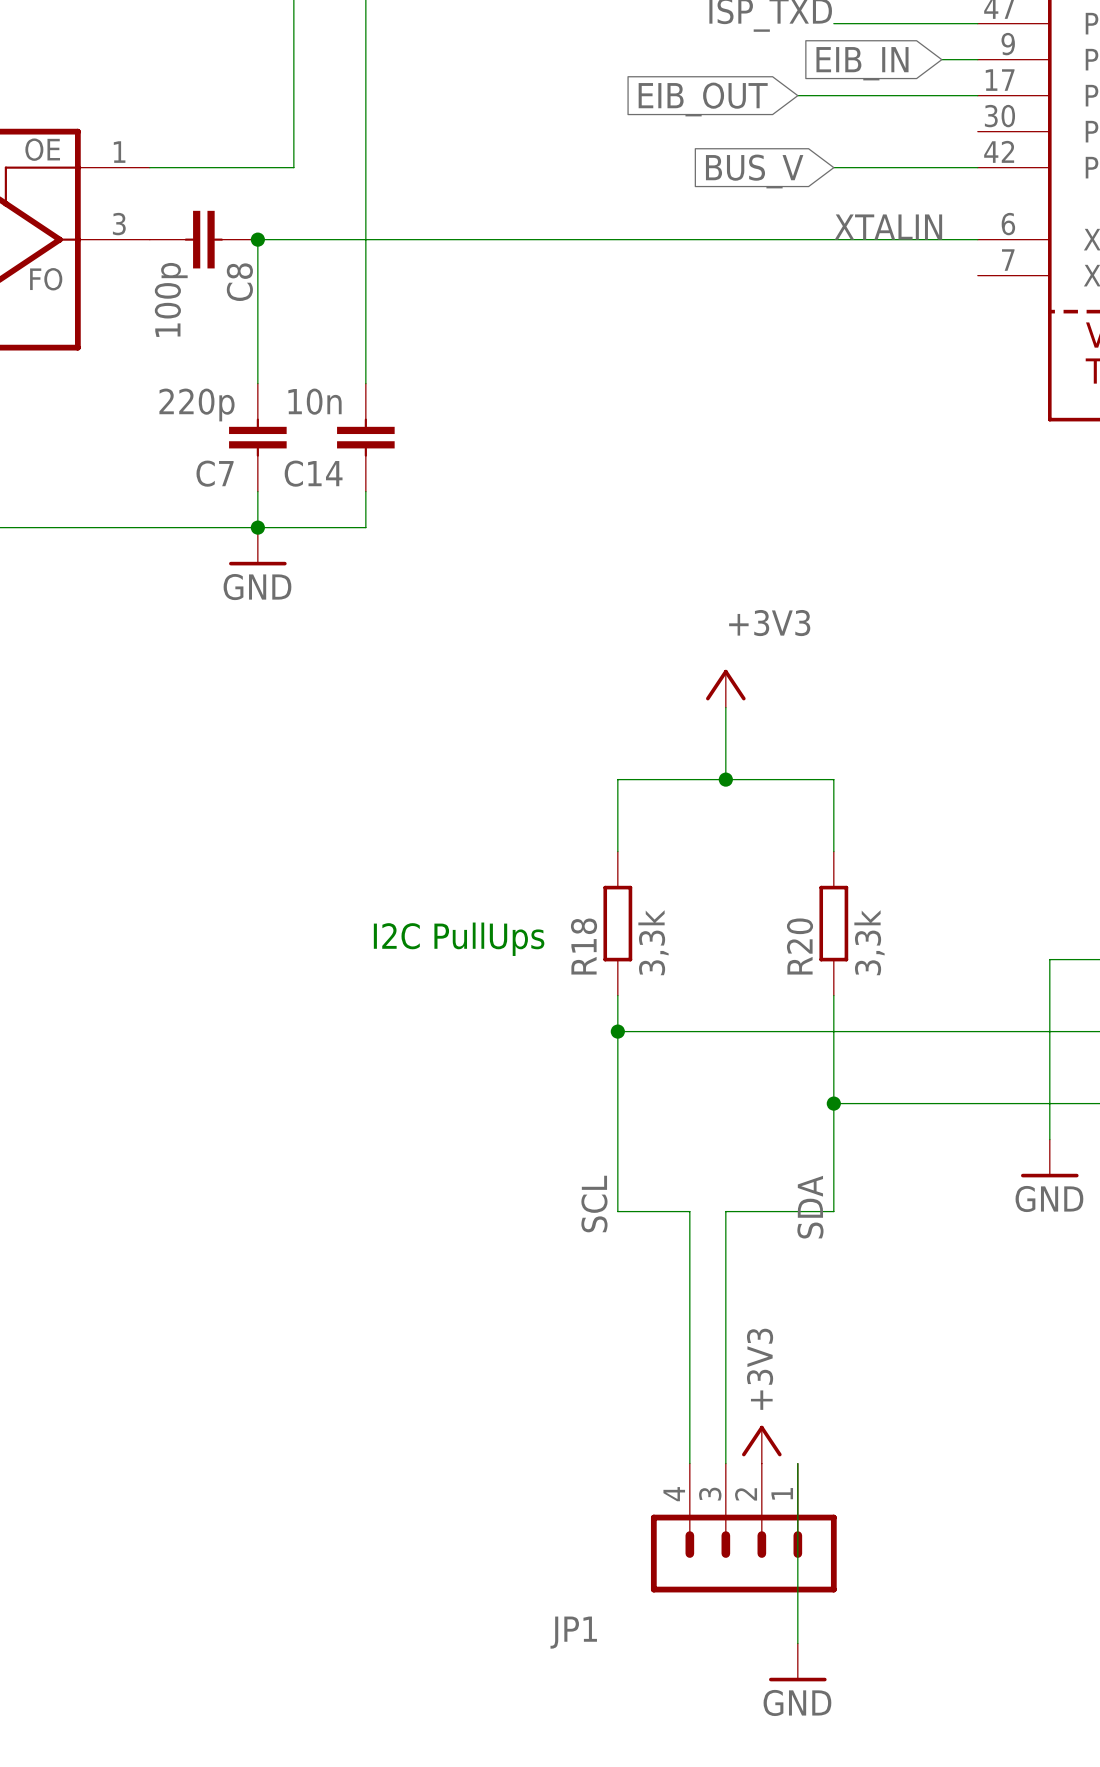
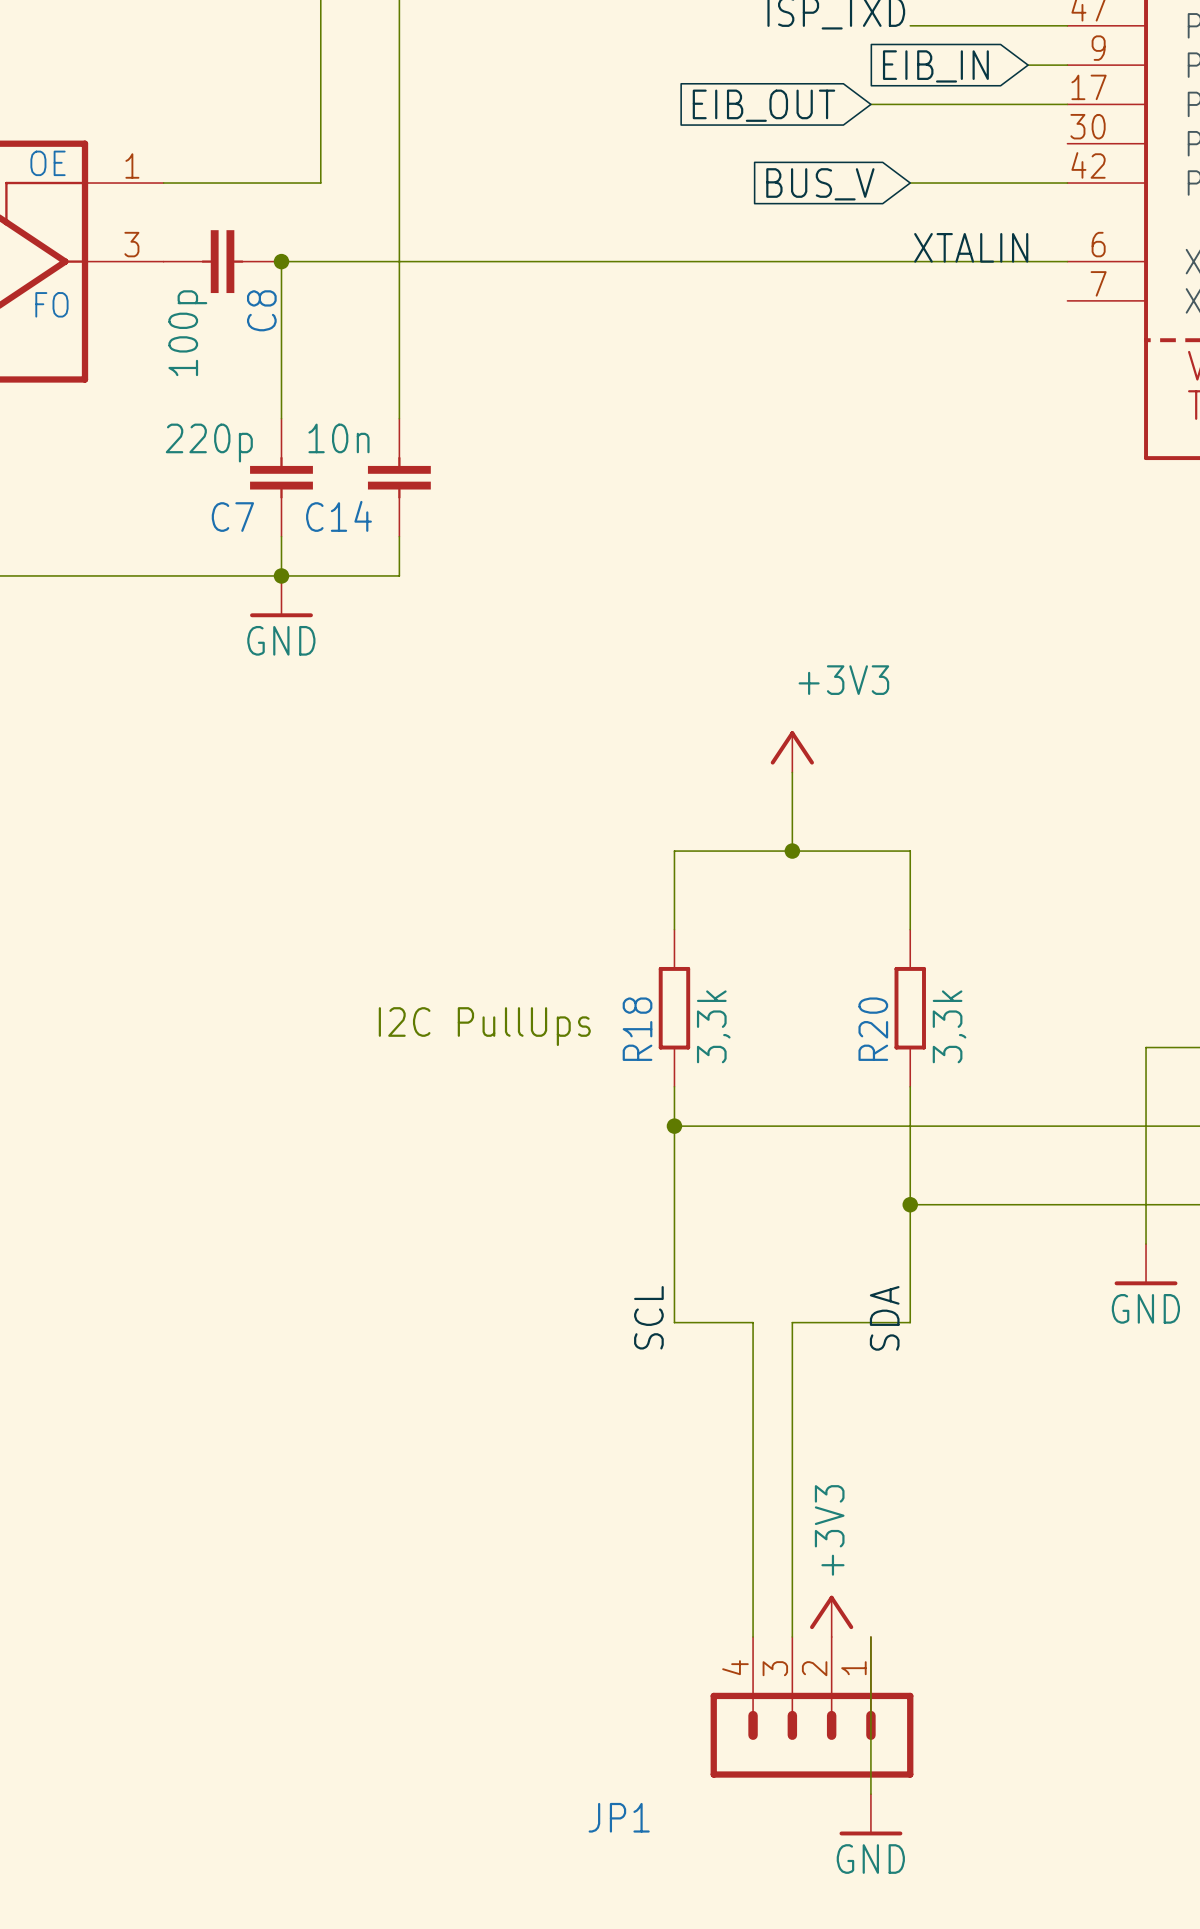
power symbol position: +3V3 (761, 1444) -> +3V3 (831, 1616)
JP1 position: (743, 1528) -> (812, 1707)

